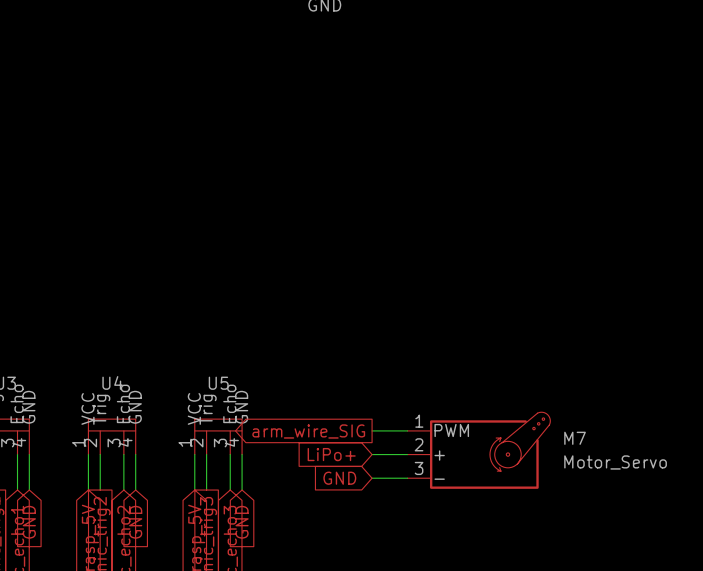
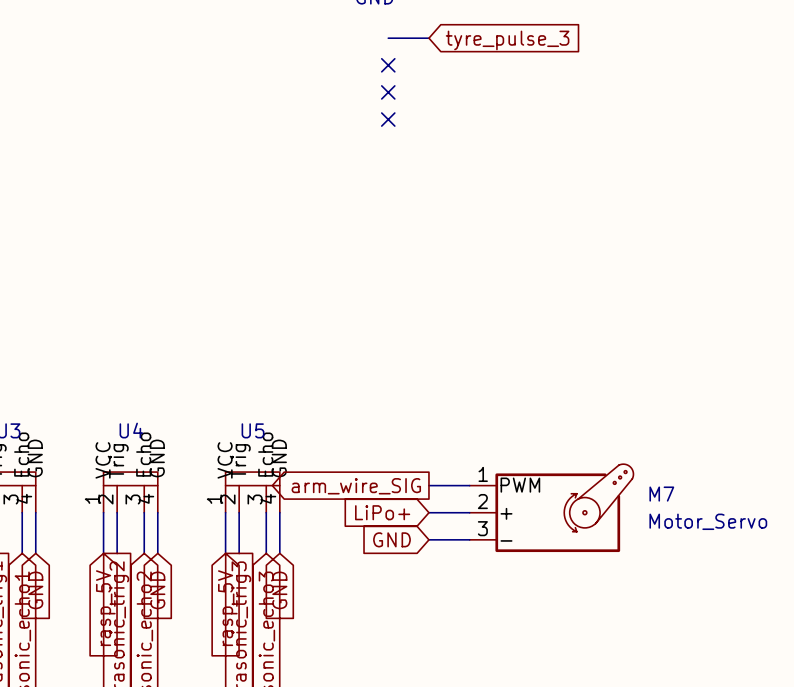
wire: none -> (388, 38) (428, 38)
global label: none -> tyre_pulse_3 (507, 40)
no-connect mark: none -> (388, 65)
no-connect mark: none -> (388, 92)
no-connect mark: none -> (388, 119)

